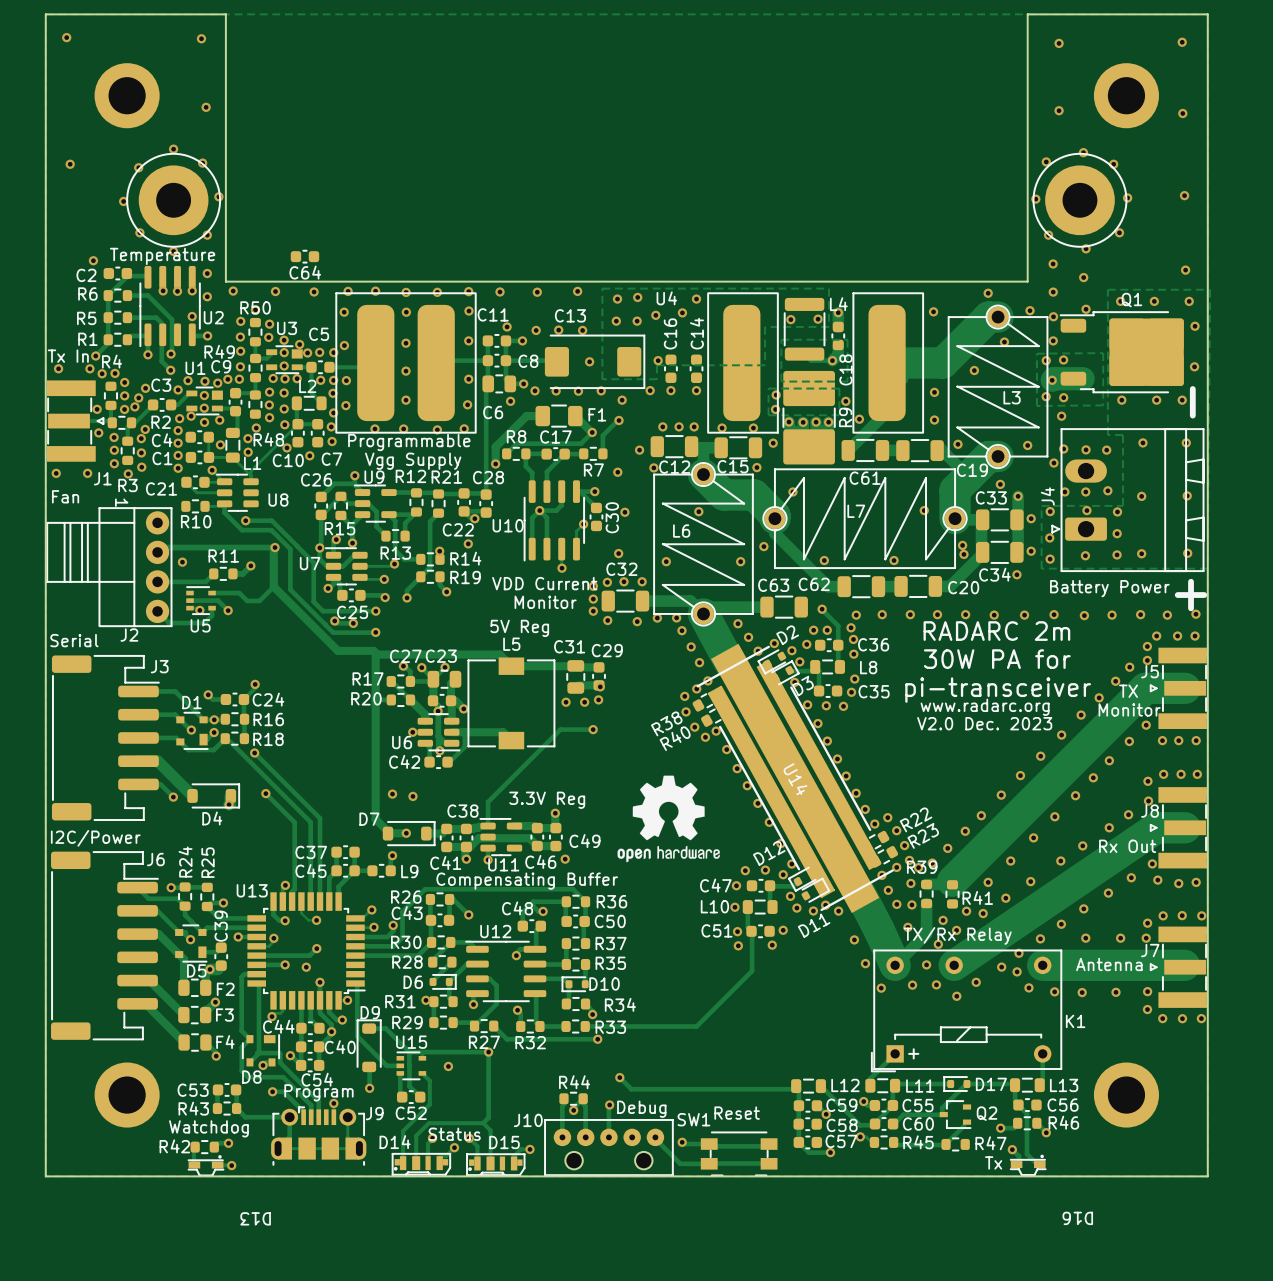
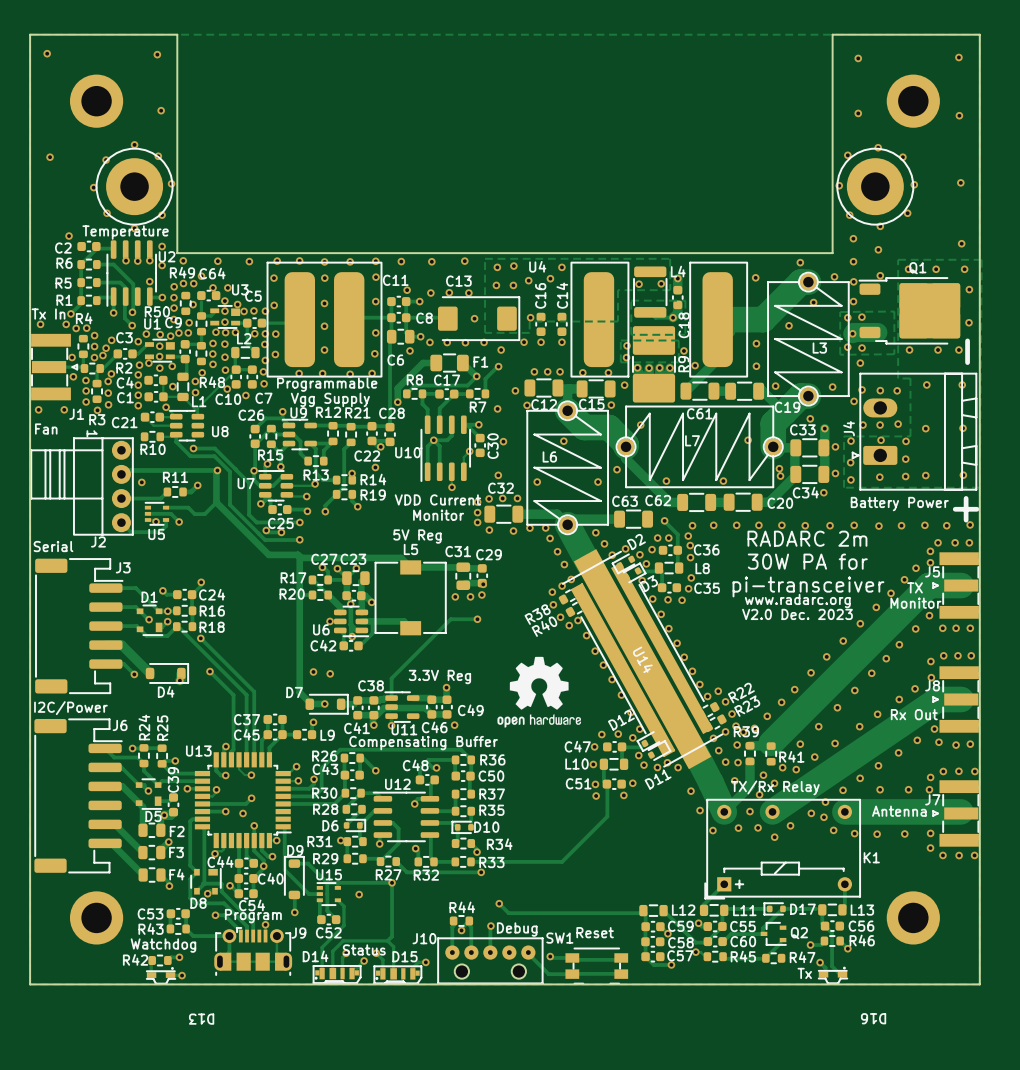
C64 position: (304, 256) -> (208, 295)
C64 name position: C64 (305, 272) -> C64 (212, 273)
R50 name position: R50 (255, 307) -> R50 (157, 311)
U2 name position: U2 (213, 317) -> U2 (167, 256)
via: none -> (183, 283)
via: none -> (193, 283)
via: (240, 321) -> none
via: none -> (174, 286)
via: none -> (227, 287)
U3 name position: U3 (287, 328) -> U3 (240, 289)
R50 position: (255, 332) -> (185, 303)
via: none -> (173, 297)
via: (240, 337) -> none
via: (268, 337) -> none
via: none -> (193, 304)
via: none -> (174, 308)
R49 name position: R49 (219, 351) -> R49 (182, 272)
via: (240, 351) -> none
via: none -> (173, 319)

